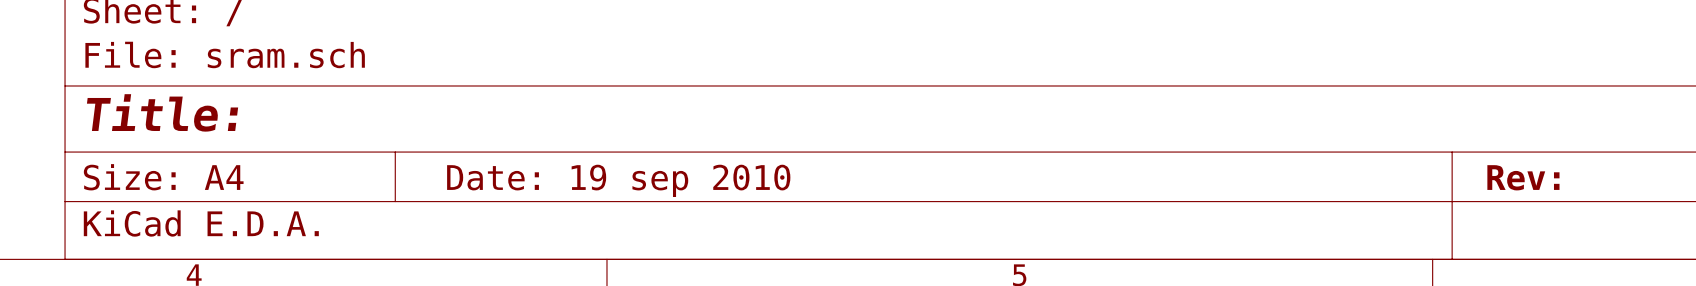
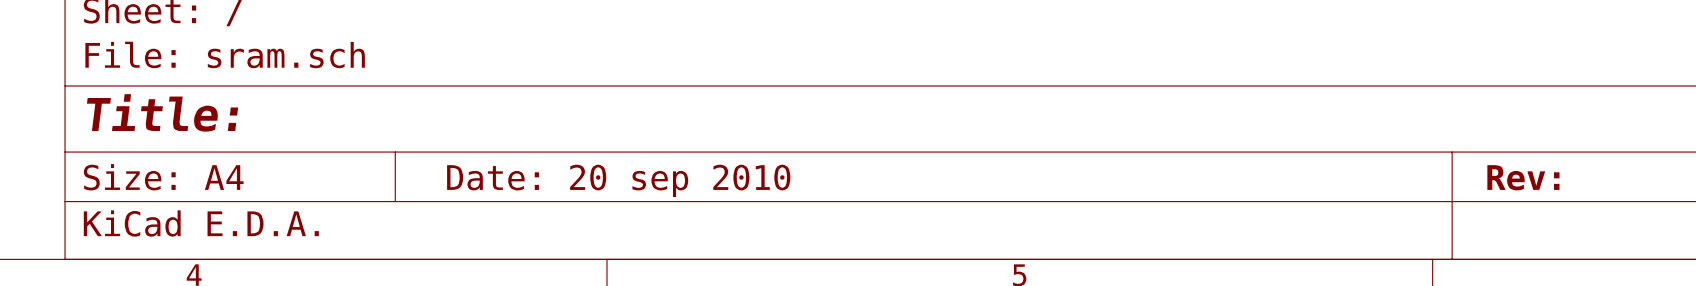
title block: Date: 19 sep 2010 (618, 180) -> Date: 20 sep 2010 (618, 180)

